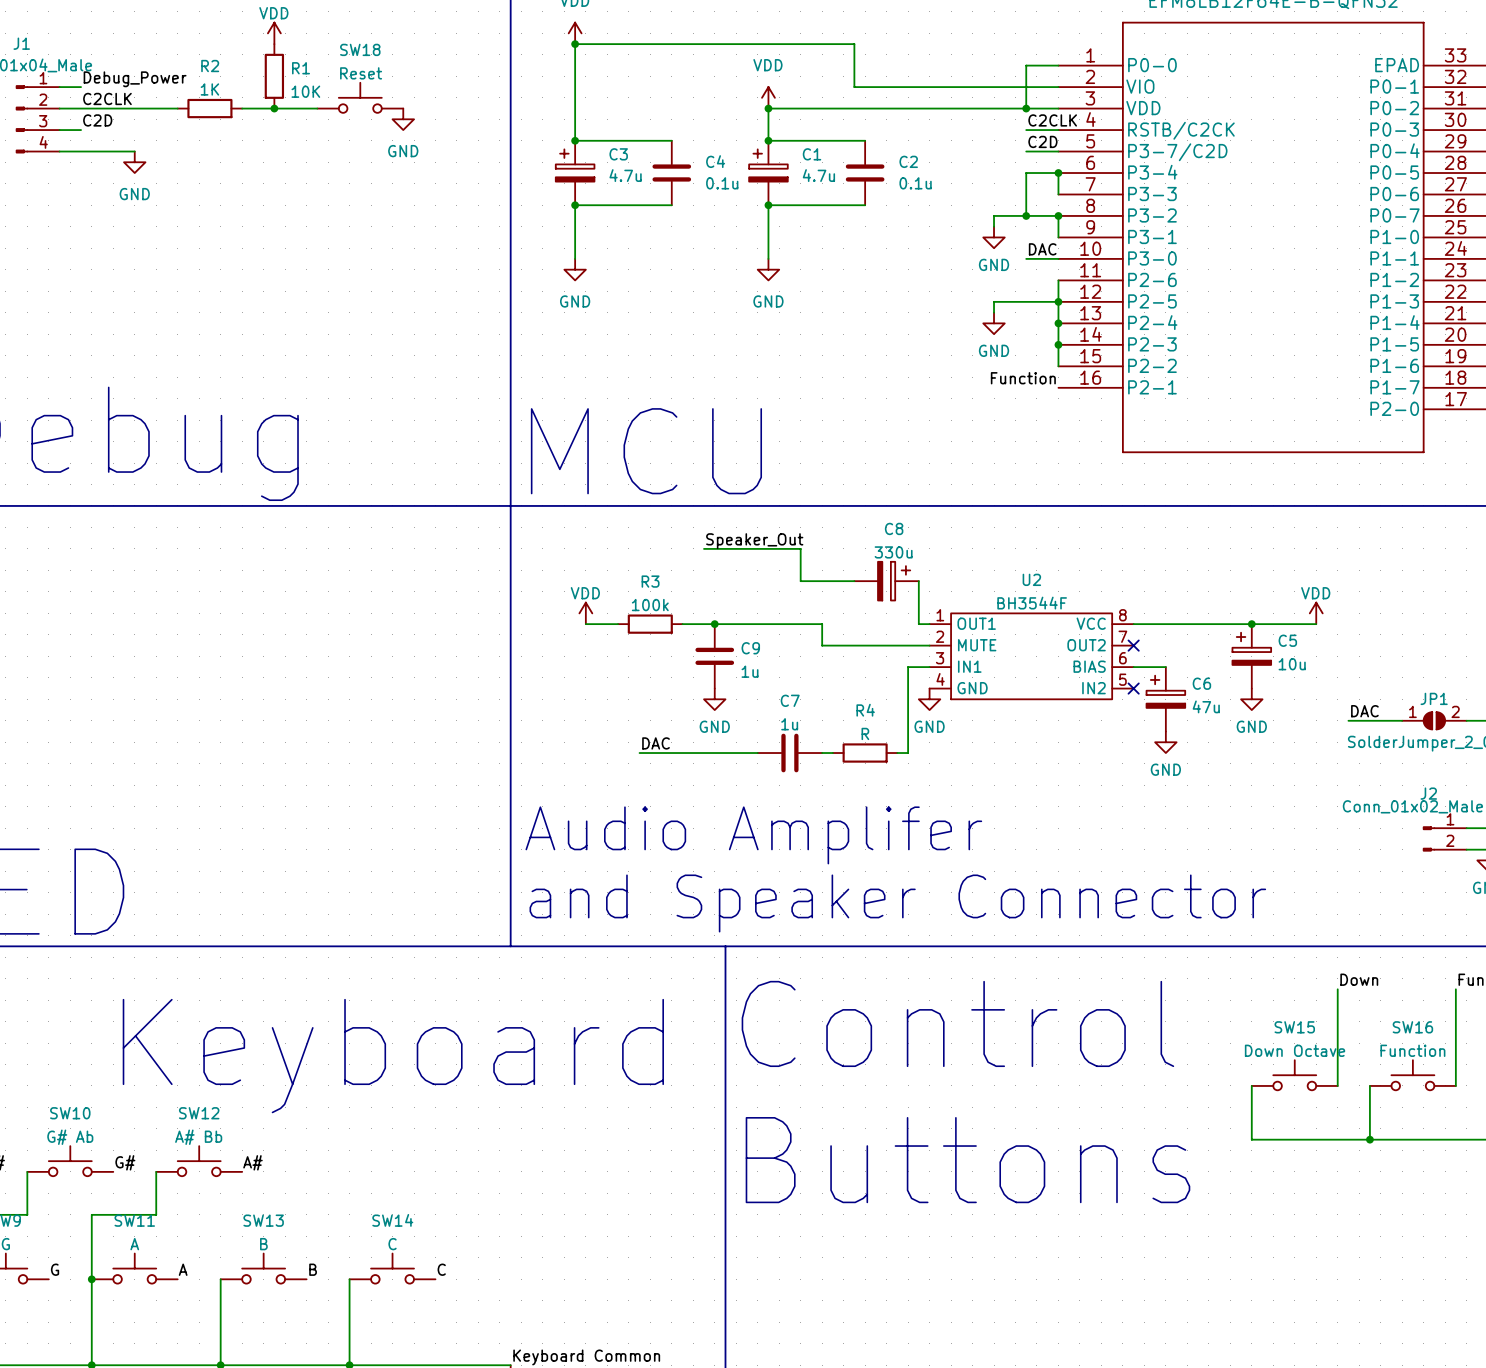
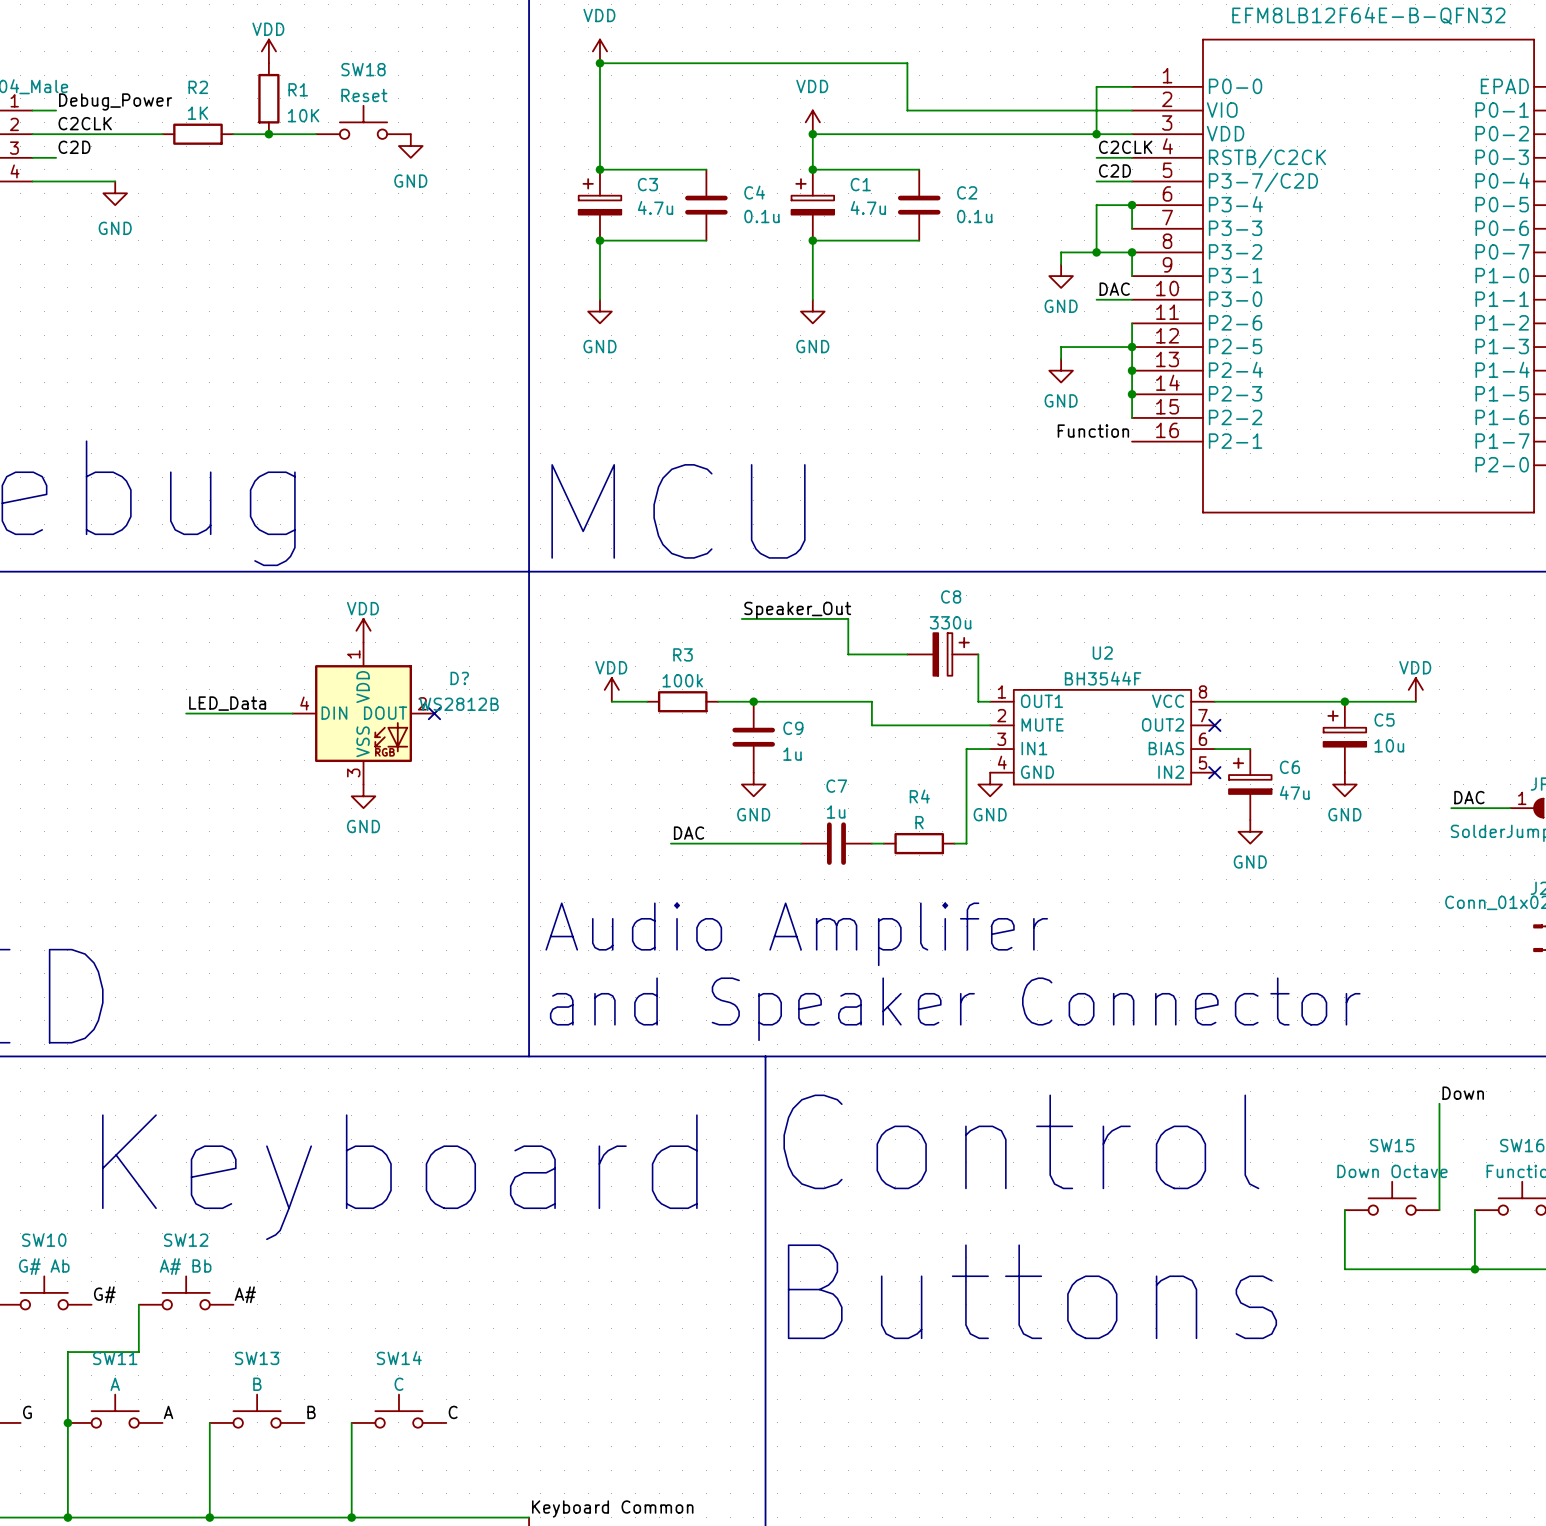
power symbol: none -> VDD (363, 630)
label: none -> LED_Data (227, 703)
wire: none -> (186, 713) (292, 713)
D?: none -> WS2812B (363, 713)
no-connect mark: none -> (434, 713)
power symbol: none -> GND (363, 796)

